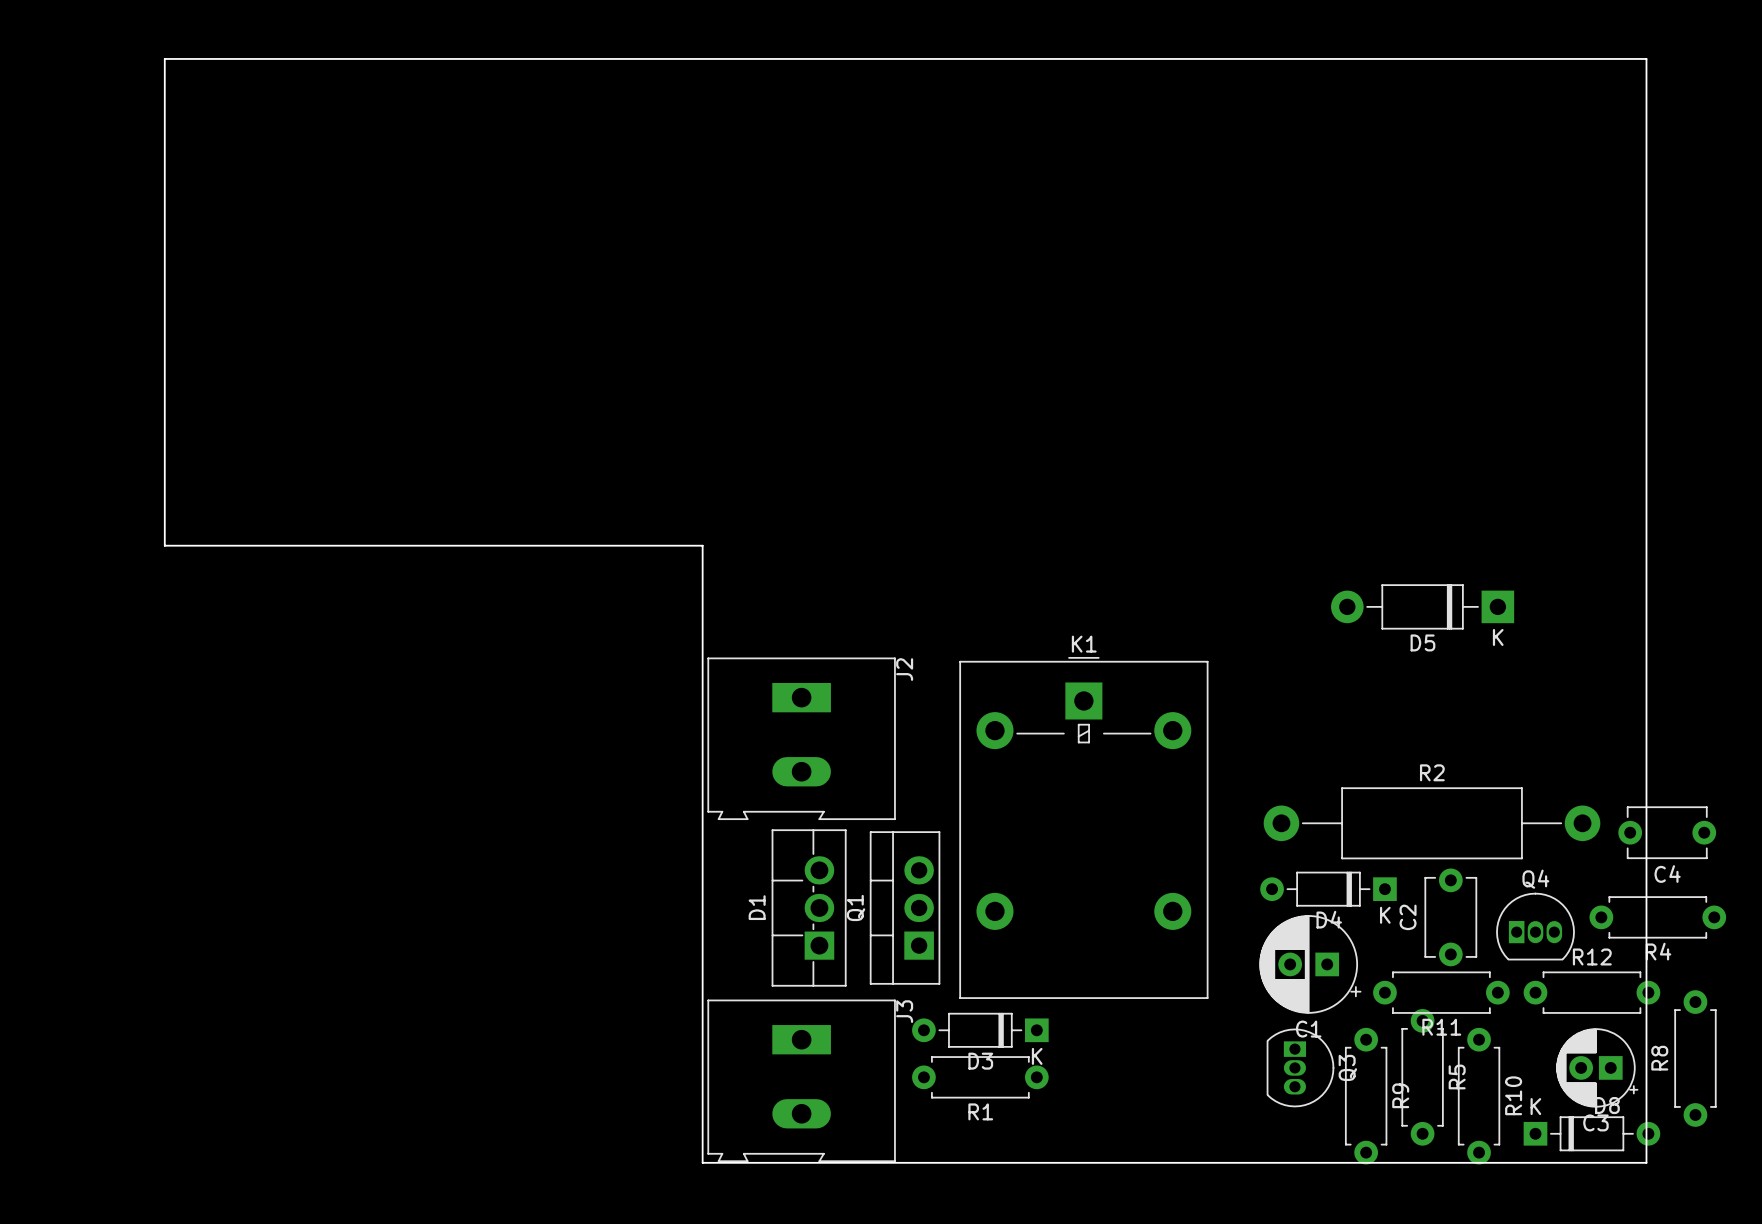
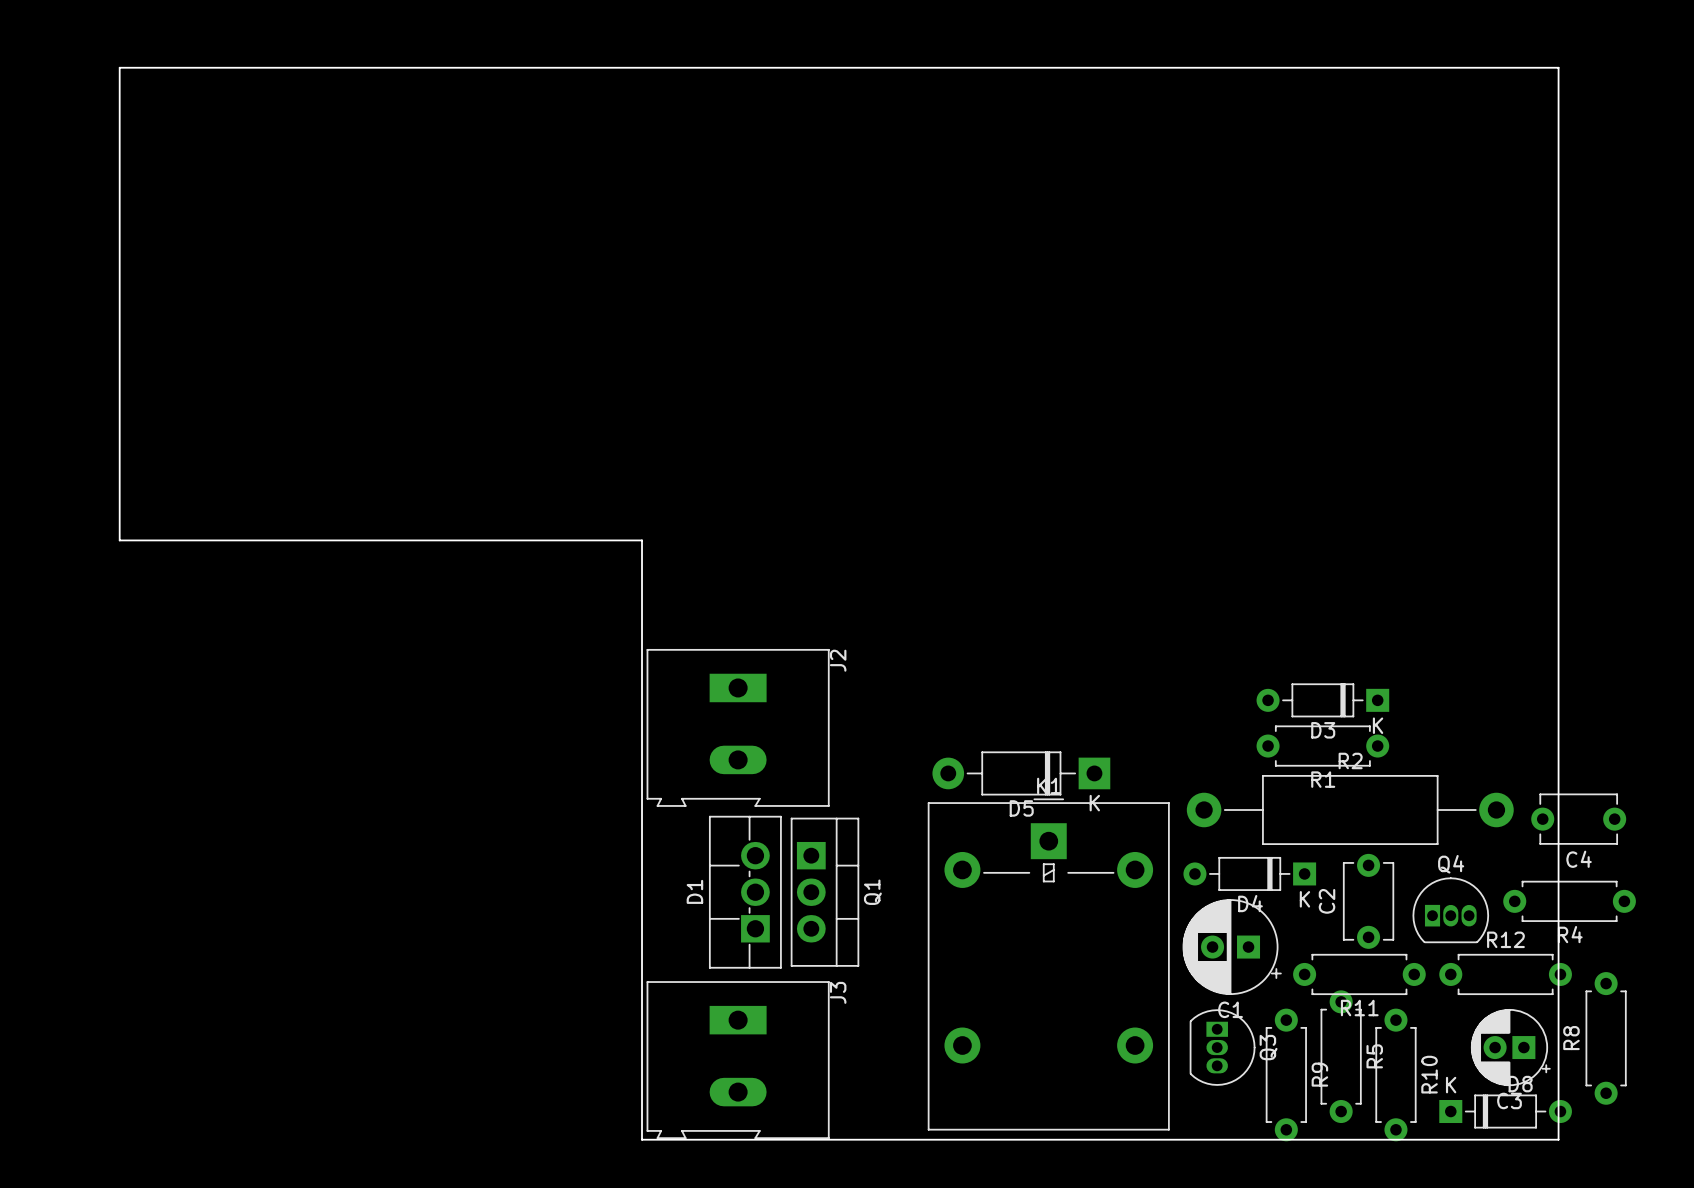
D5 position: (1422, 606) -> (1021, 773)
K1 position: (1083, 827) -> (1048, 964)
Q1 rotation: 0° (905, 907) -> 180° (824, 892)
D3 position: (980, 1030) -> (1322, 700)
R1 position: (980, 1077) -> (1322, 746)

